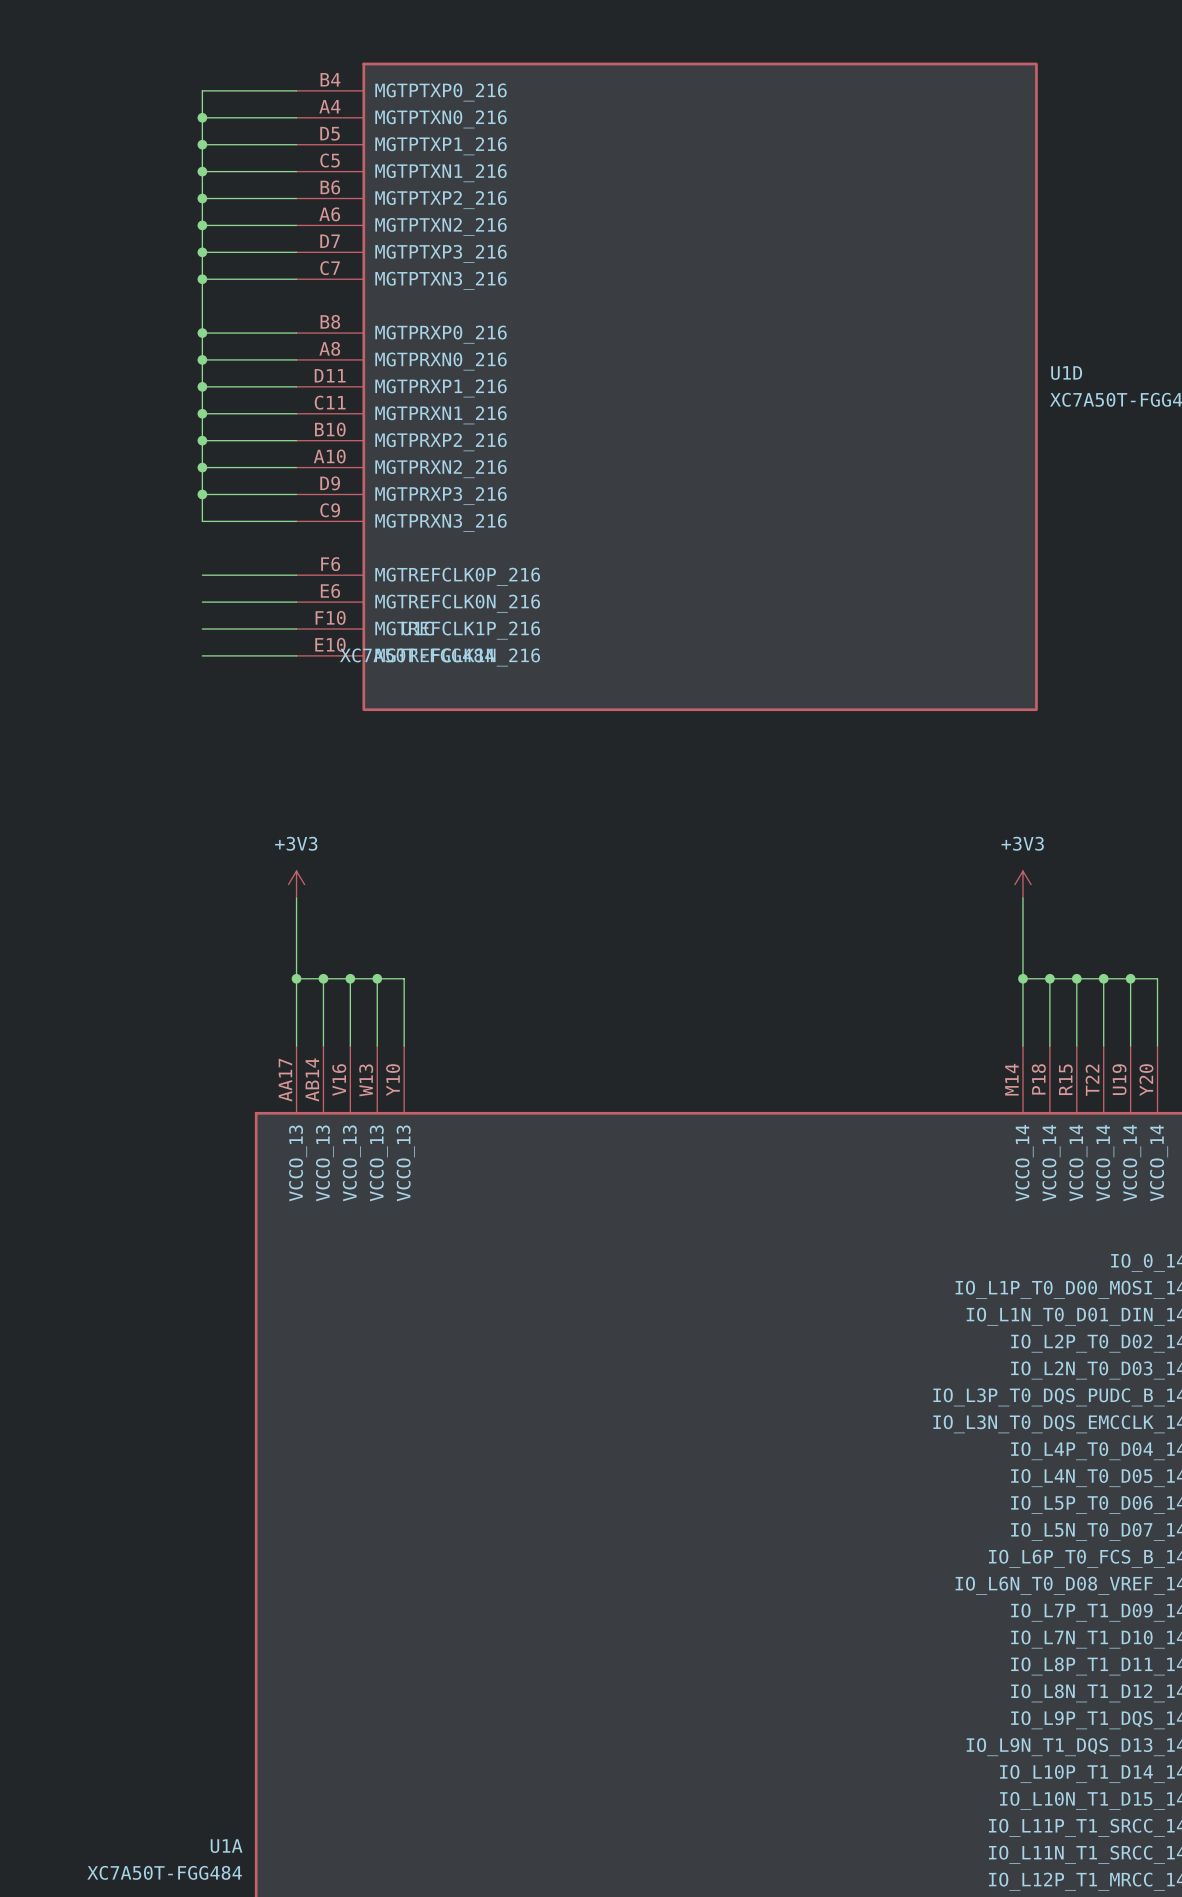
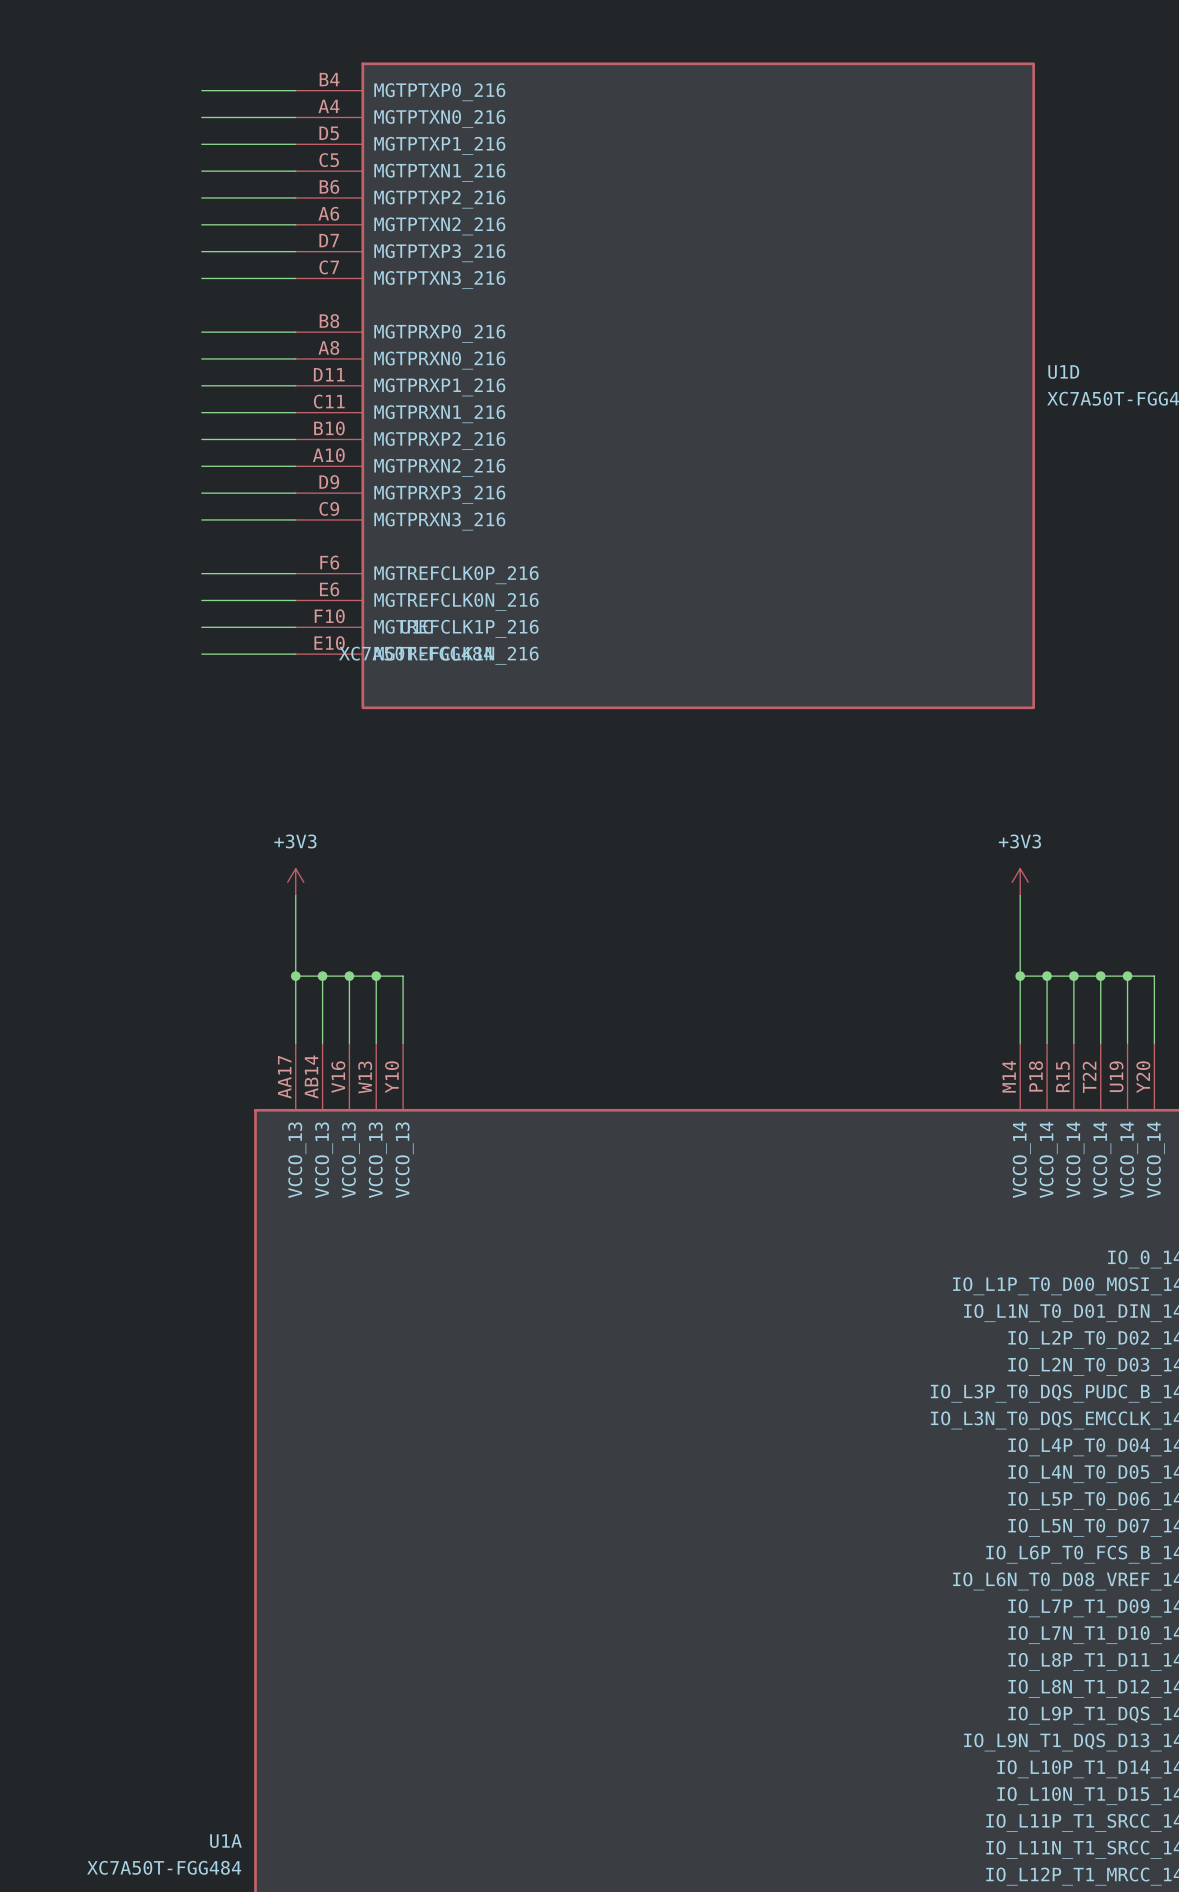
wire: (202, 90) (202, 521) -> none
junction: (202, 117) -> none
junction: (202, 144) -> none
junction: (202, 171) -> none
junction: (202, 198) -> none
junction: (202, 225) -> none
junction: (202, 252) -> none
junction: (202, 279) -> none
junction: (202, 333) -> none
junction: (202, 359) -> none
junction: (202, 386) -> none
junction: (202, 413) -> none
junction: (202, 440) -> none
junction: (202, 467) -> none
junction: (202, 494) -> none

